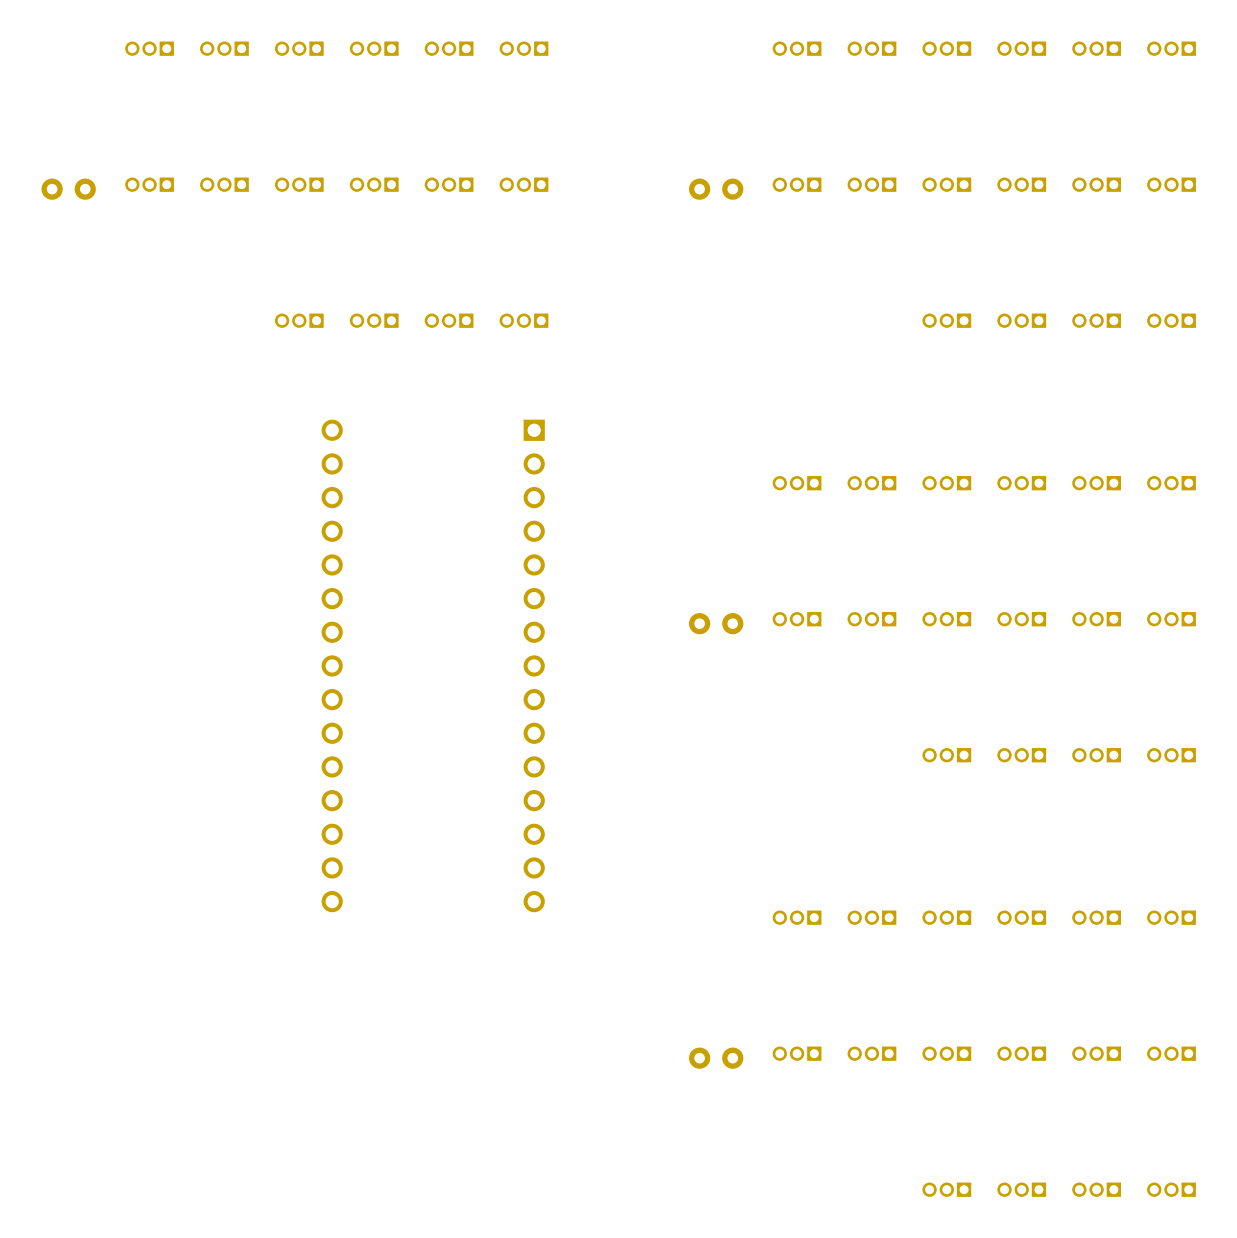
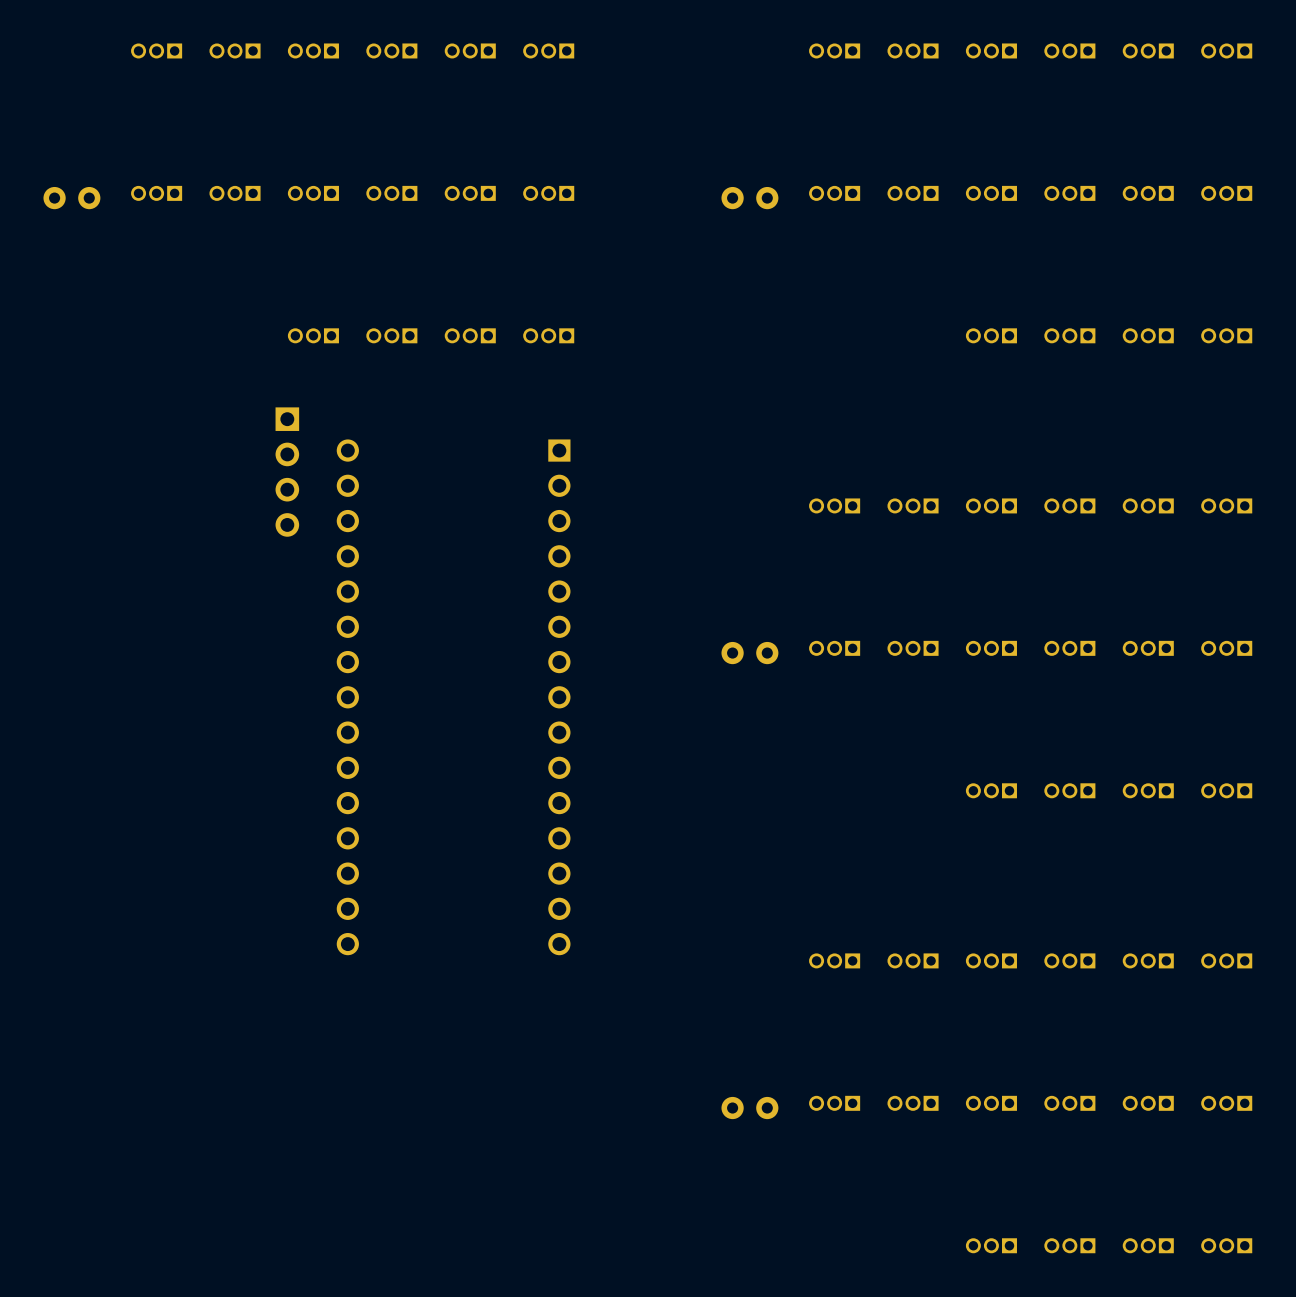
part: none -> (287, 472)

